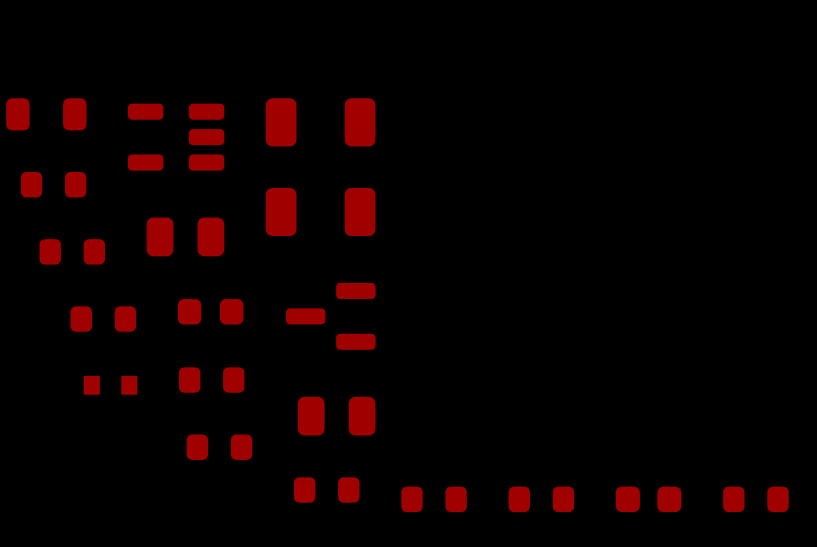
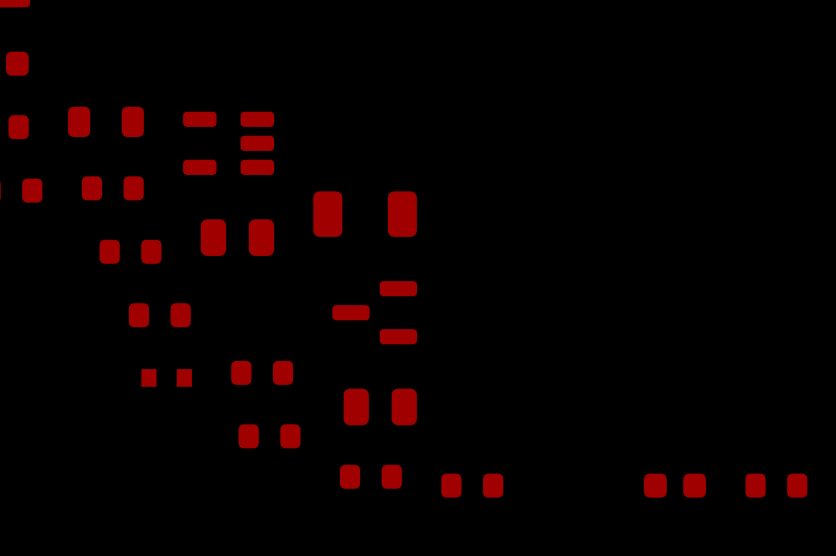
part: (320, 122) -> none
part: (210, 311) -> none
part: (541, 499) -> none

